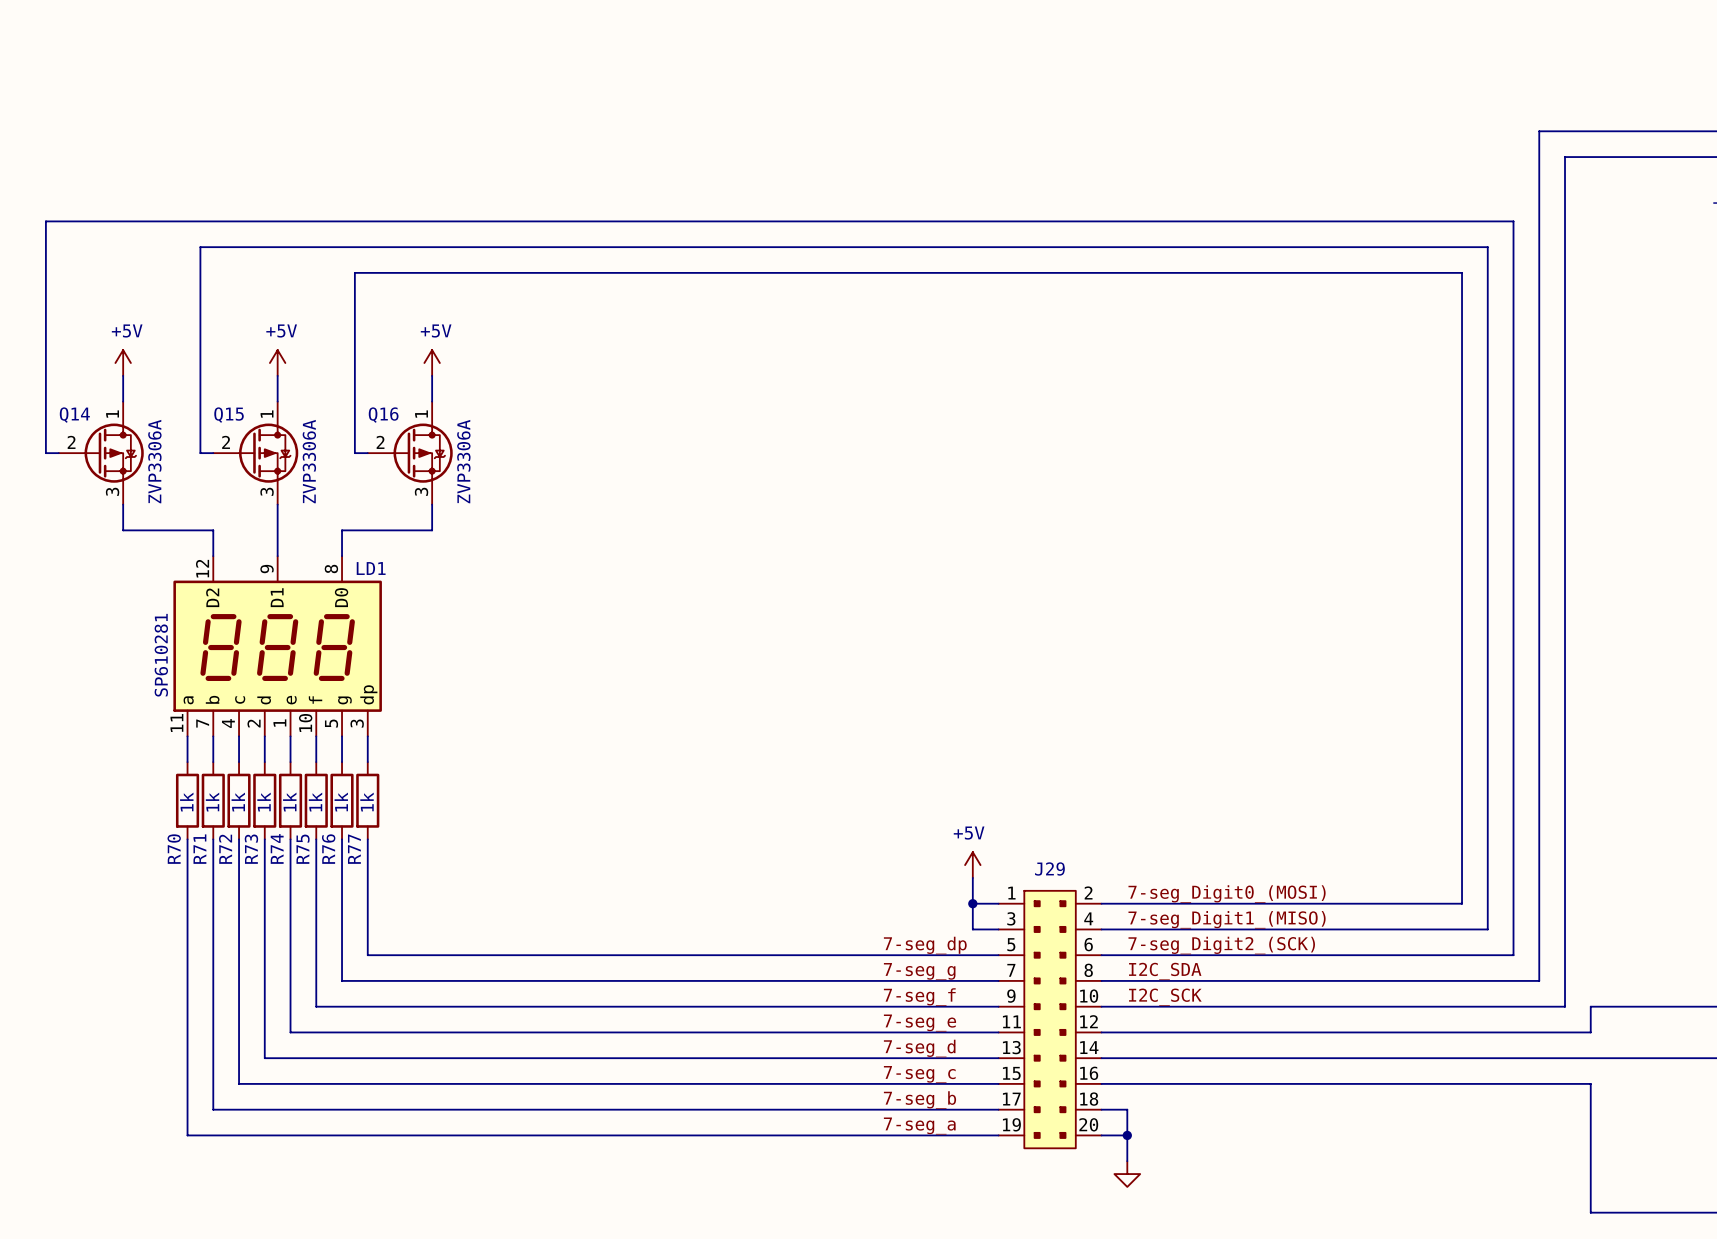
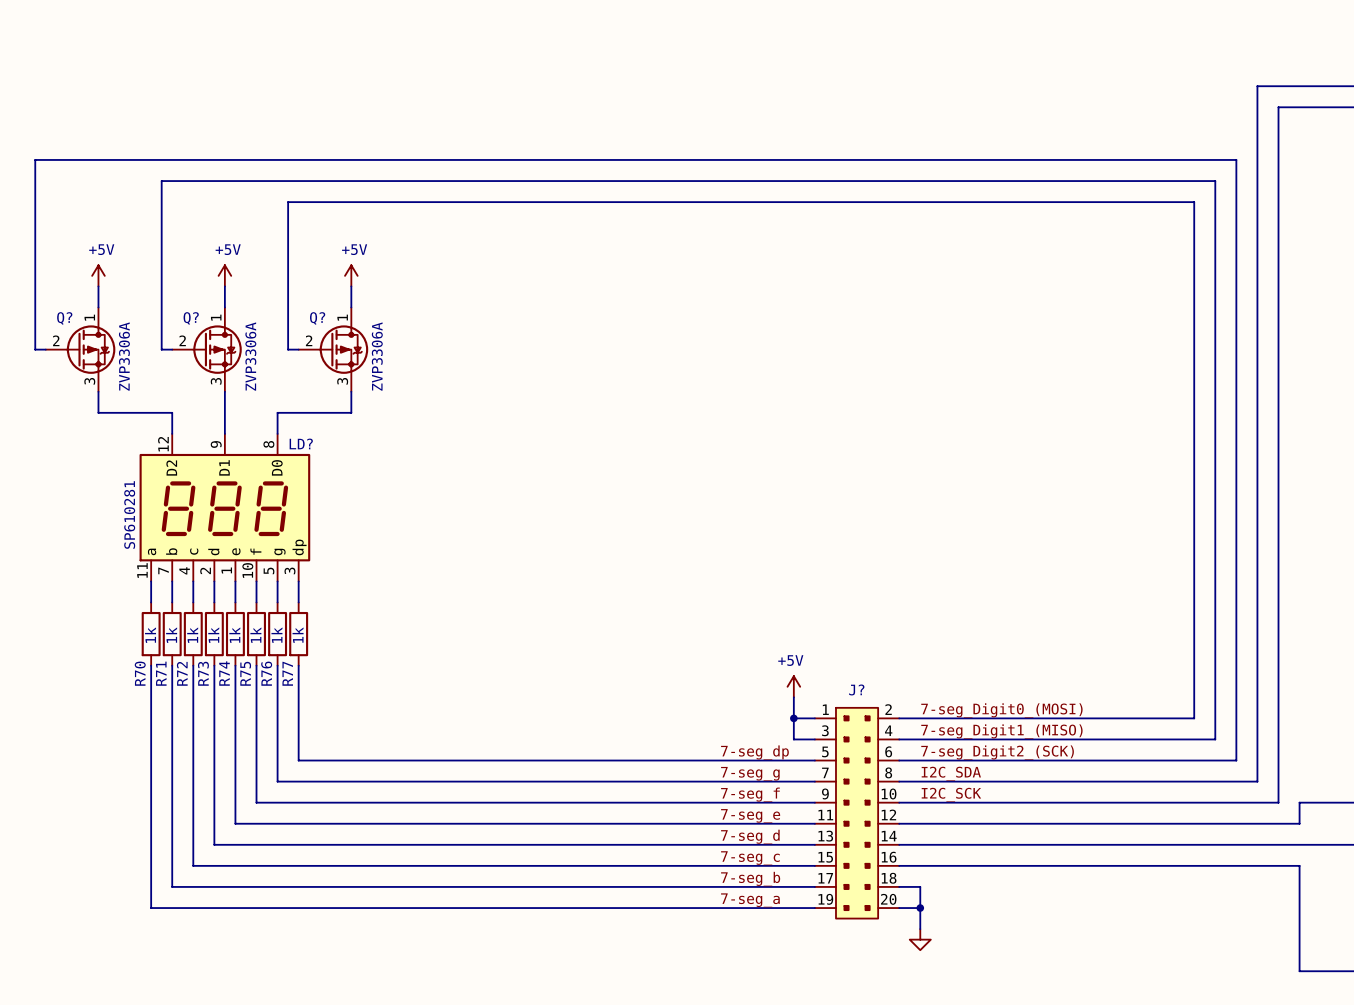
Q14 name: Q14 (74, 415) -> Q? (64, 318)
Q15 name: Q15 (229, 415) -> Q? (191, 318)
Q16 name: Q16 (383, 415) -> Q? (317, 318)
LD1 name: LD1 (371, 568) -> LD? (301, 443)
J29 name: J29 (1049, 868) -> J? (856, 689)

